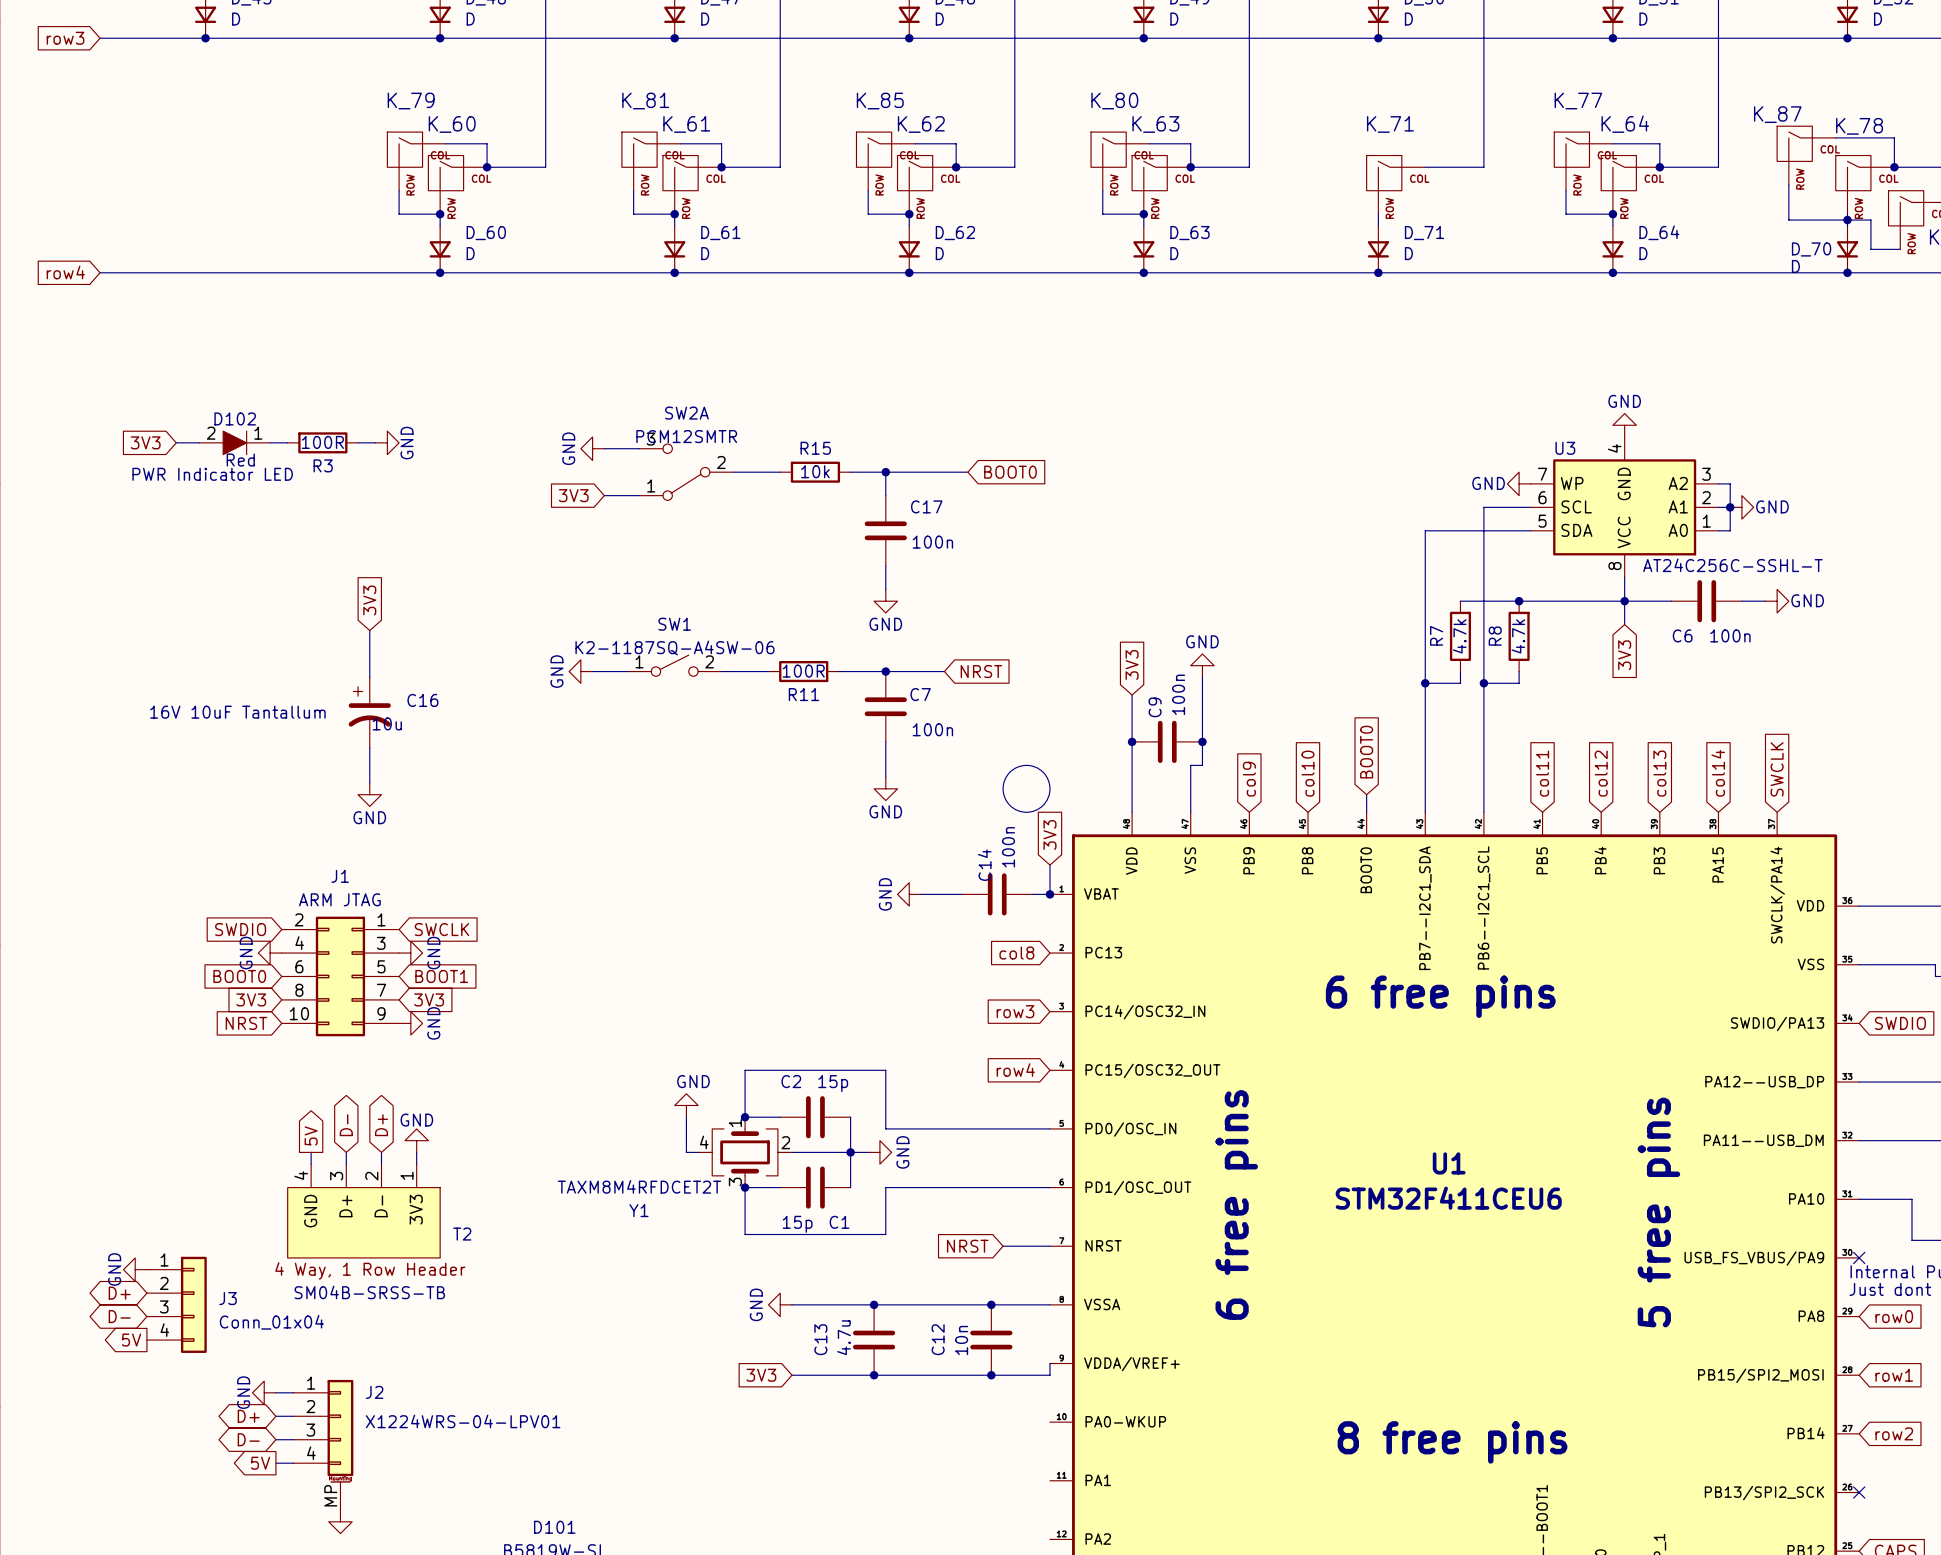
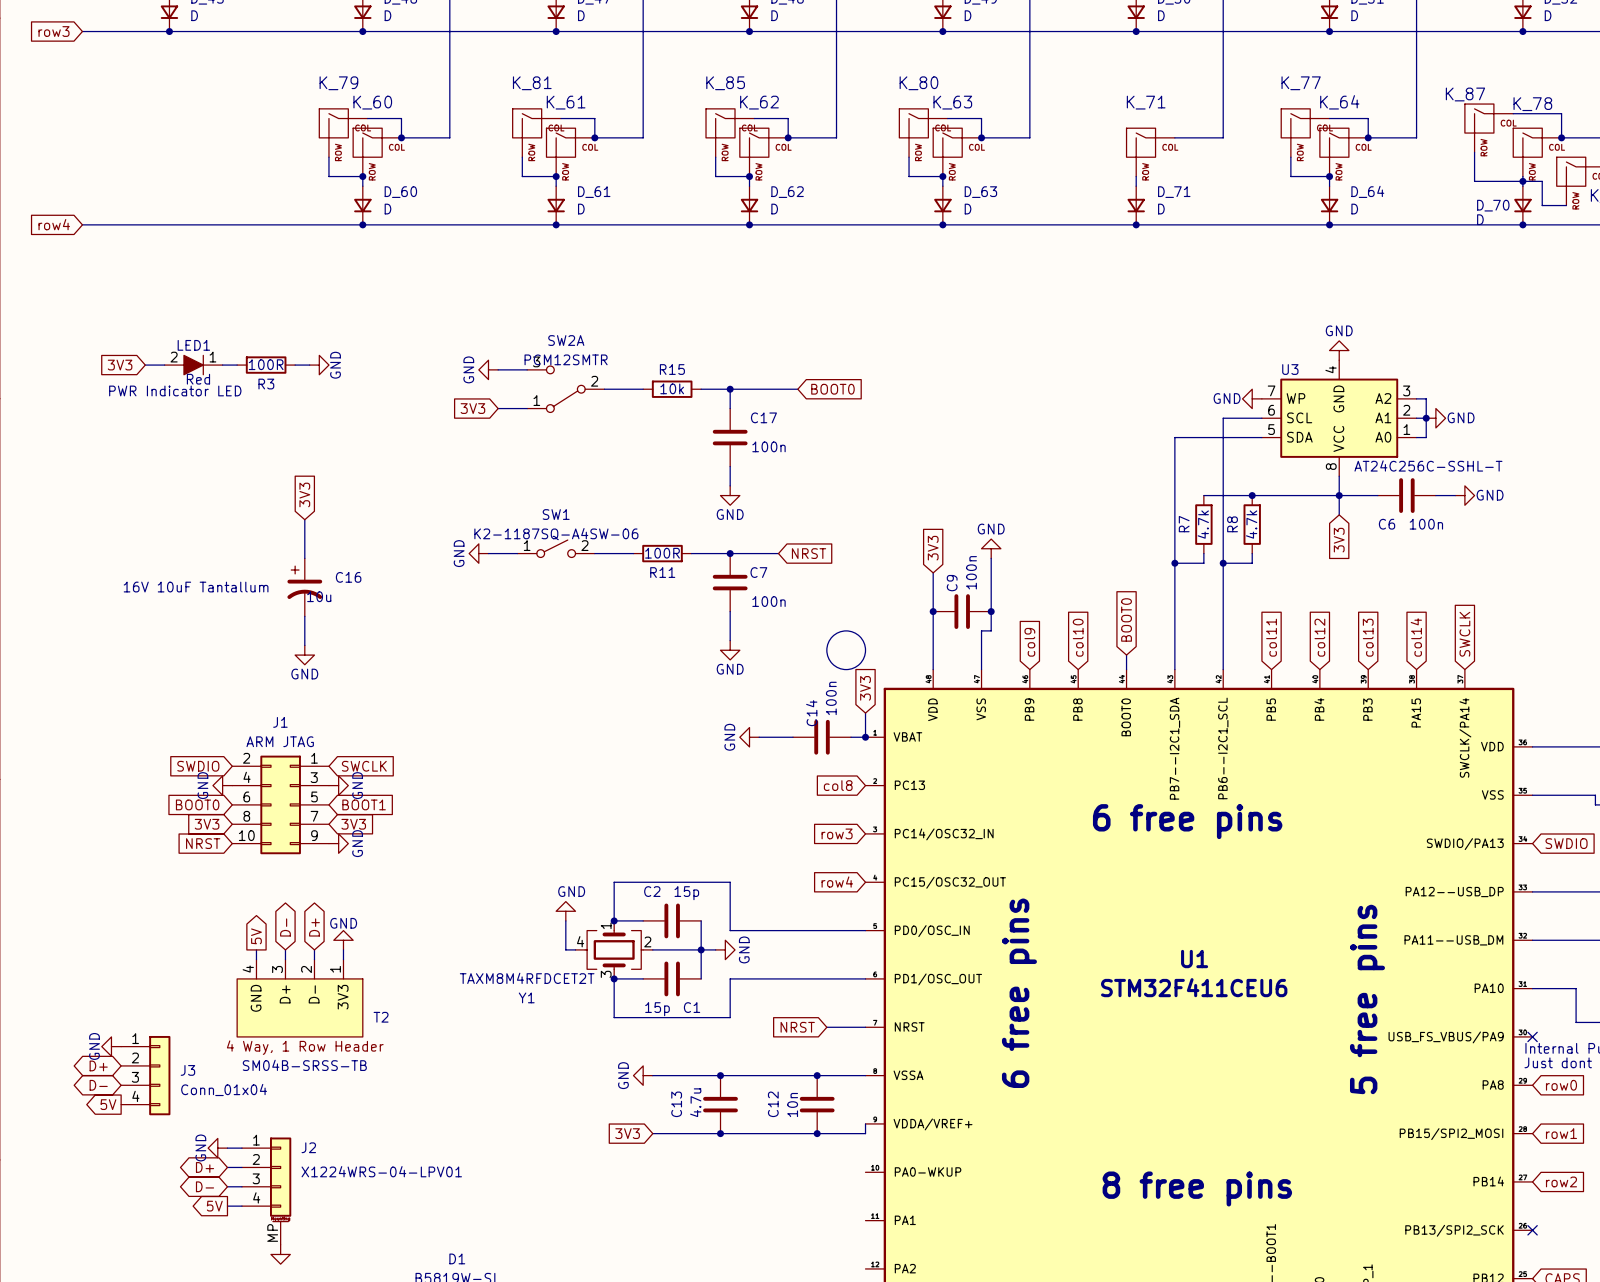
D102 name: D102 (235, 418) -> LED1 (193, 345)
D101 name: D101 (554, 1527) -> D1 (457, 1258)

